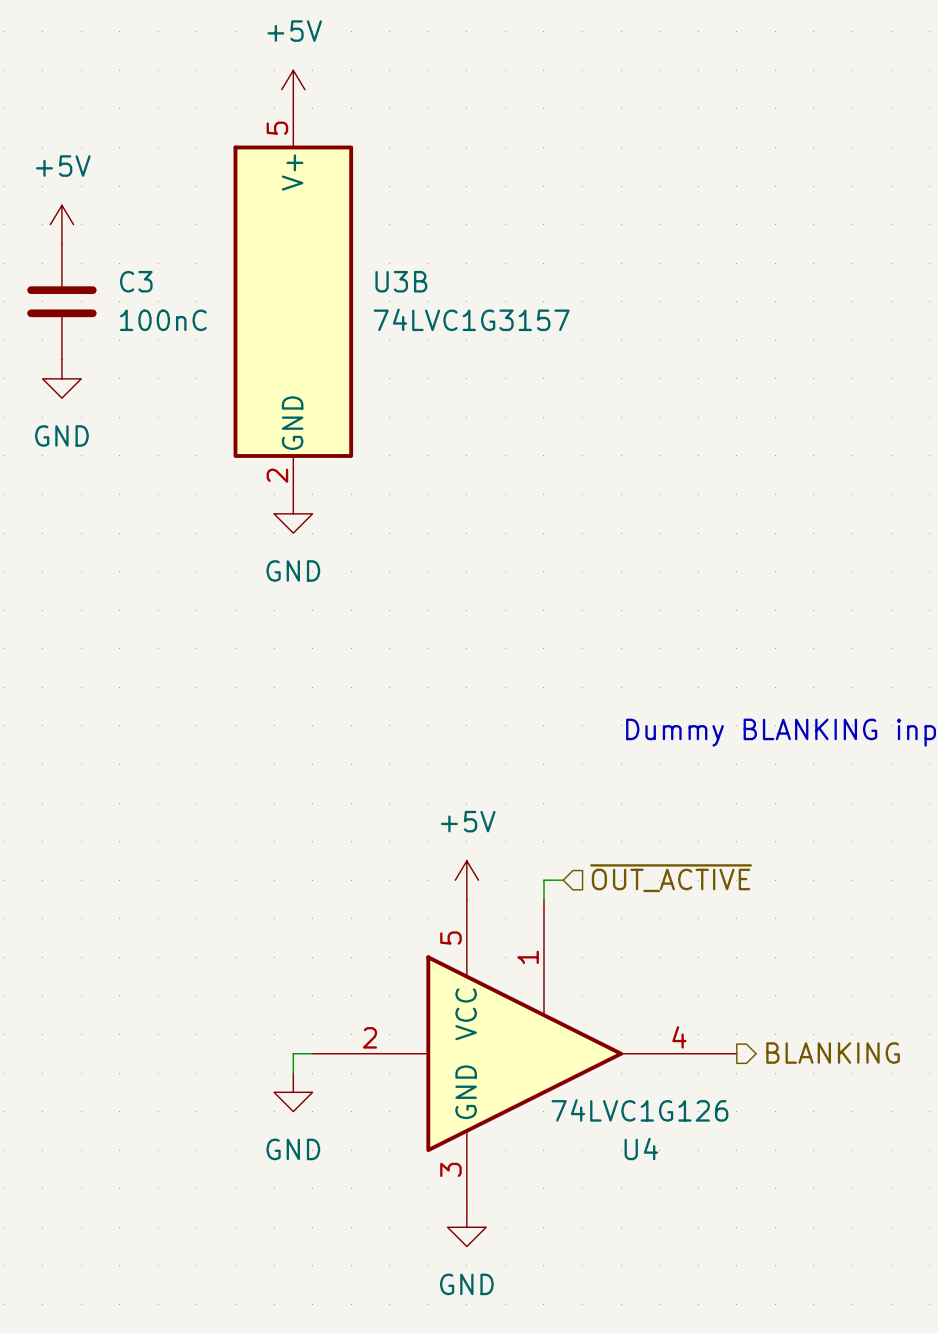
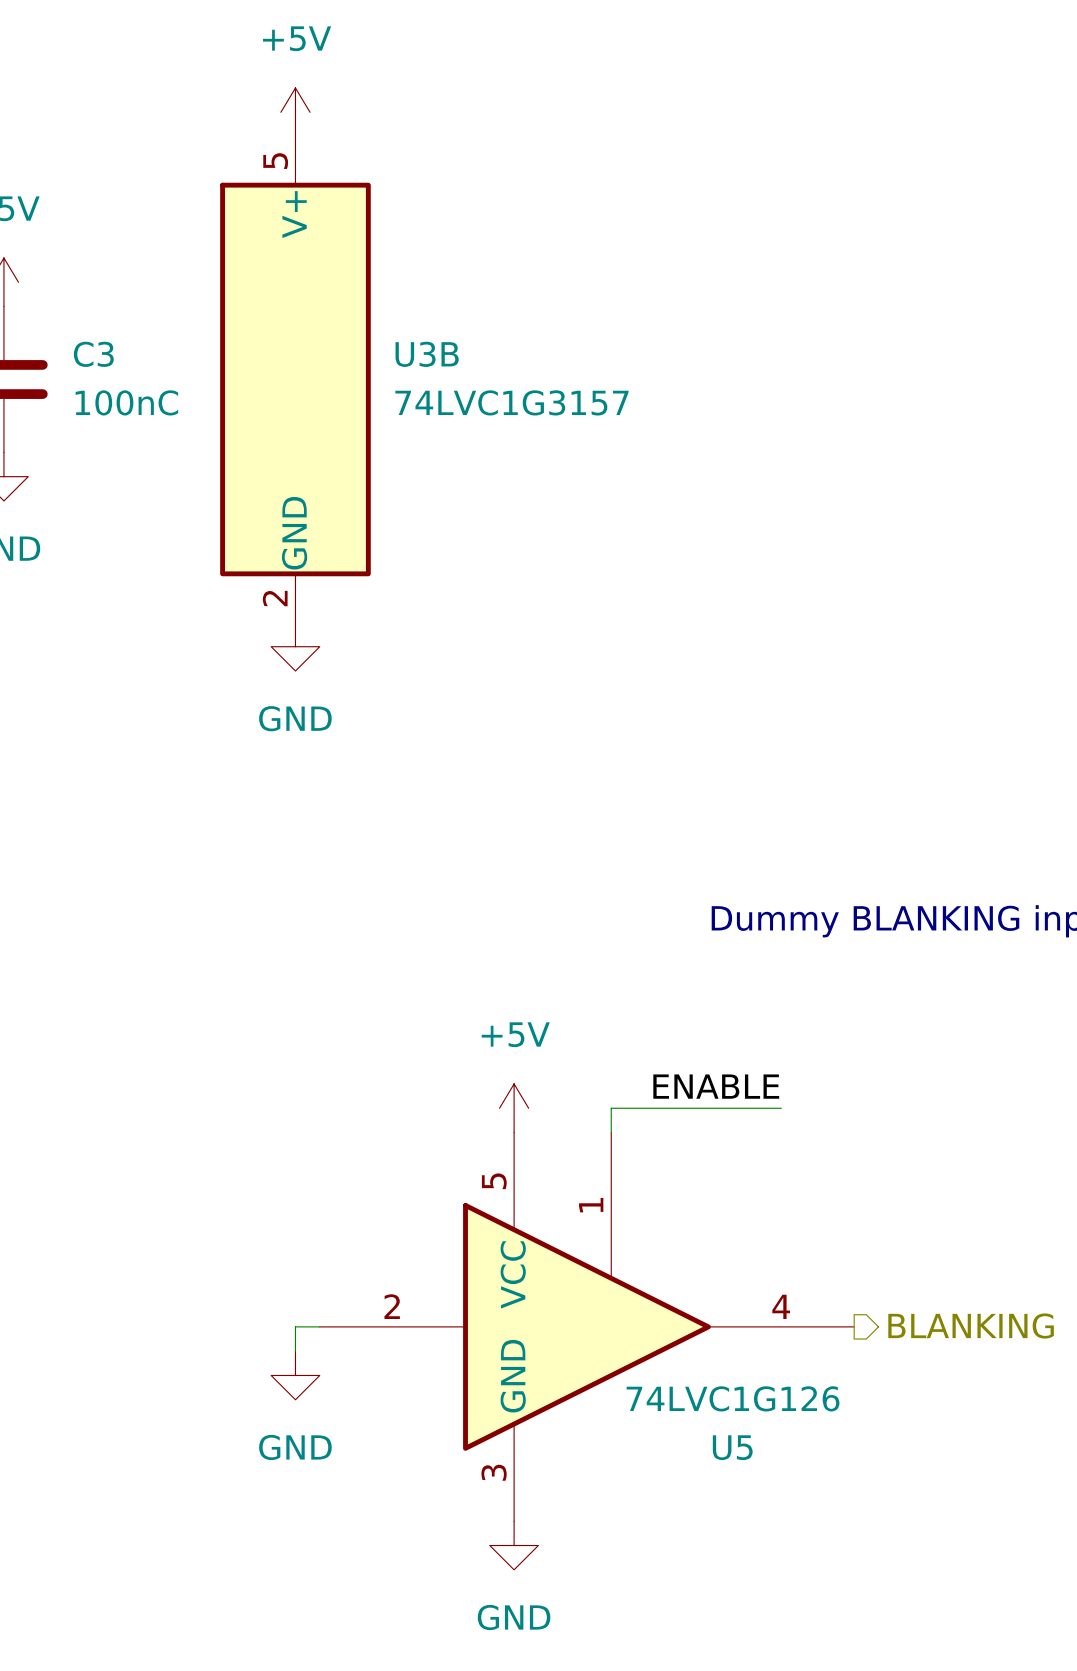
label: none -> ENABLE (716, 1086)
hierarchical label: ~{OUT_ACTIVE} (671, 878) -> none
wire: none -> (635, 1108) (781, 1108)
U4 name: U4 (641, 1148) -> U5 (732, 1447)

